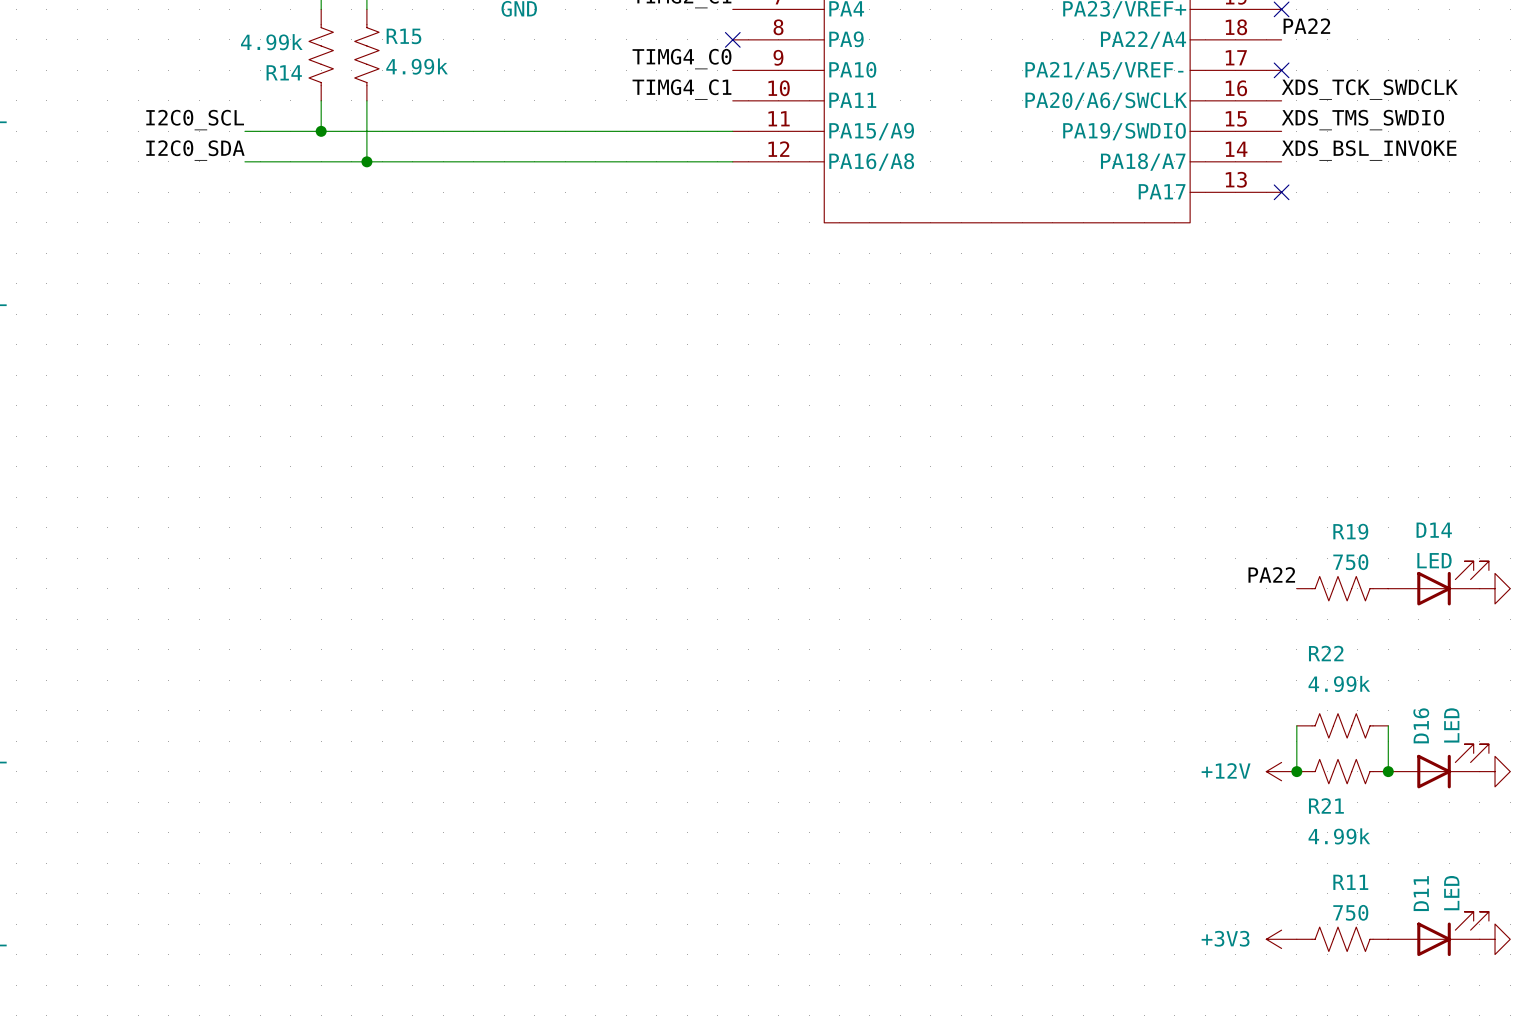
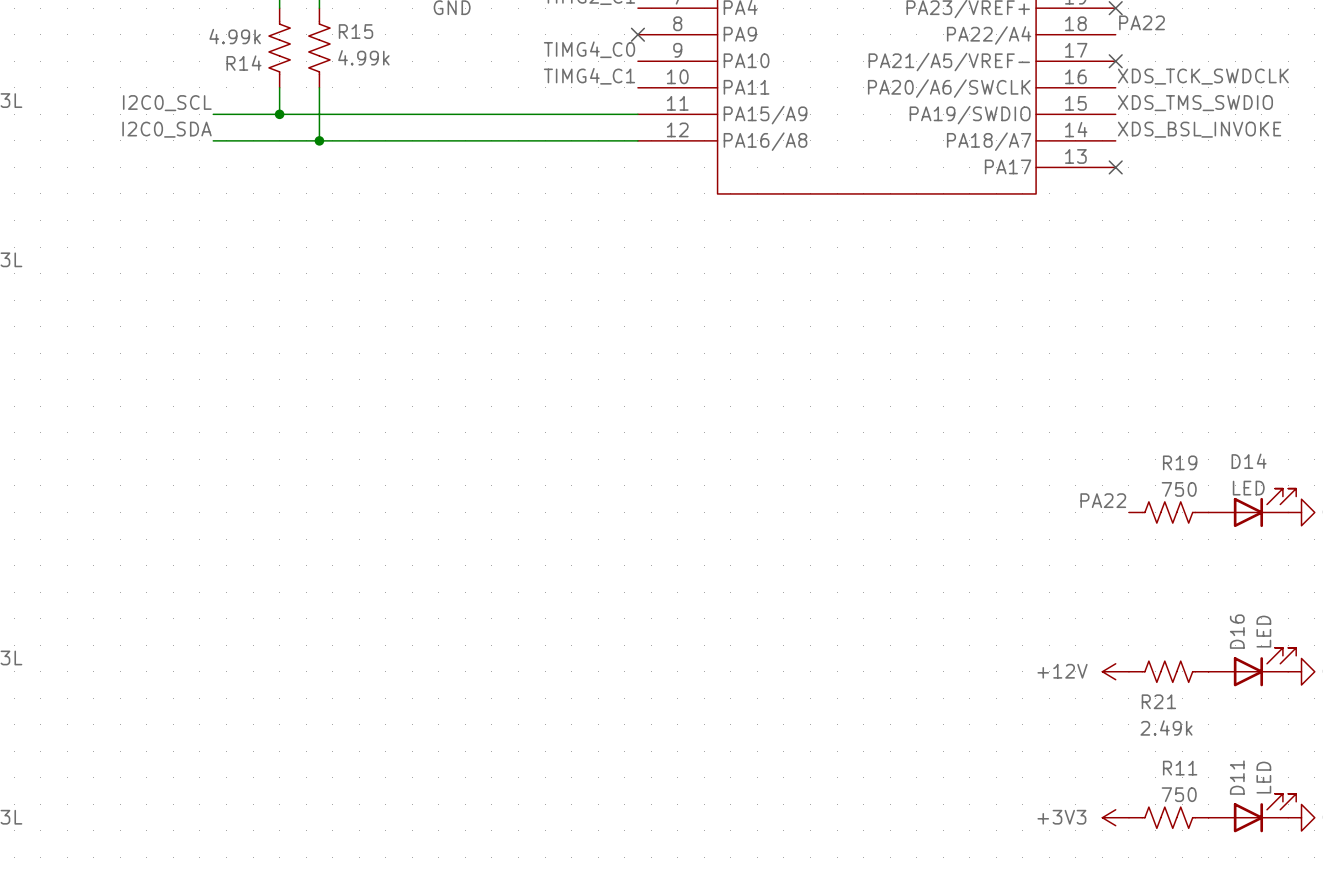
wire: (1296, 725) (1296, 771) -> none
R22: 4.99k (1342, 725) -> none
wire: (1388, 725) (1388, 771) -> none
junction: (1296, 771) -> none
junction: (1388, 771) -> none
R21 value: 4.99k (1339, 836) -> 2.49k (1166, 727)

